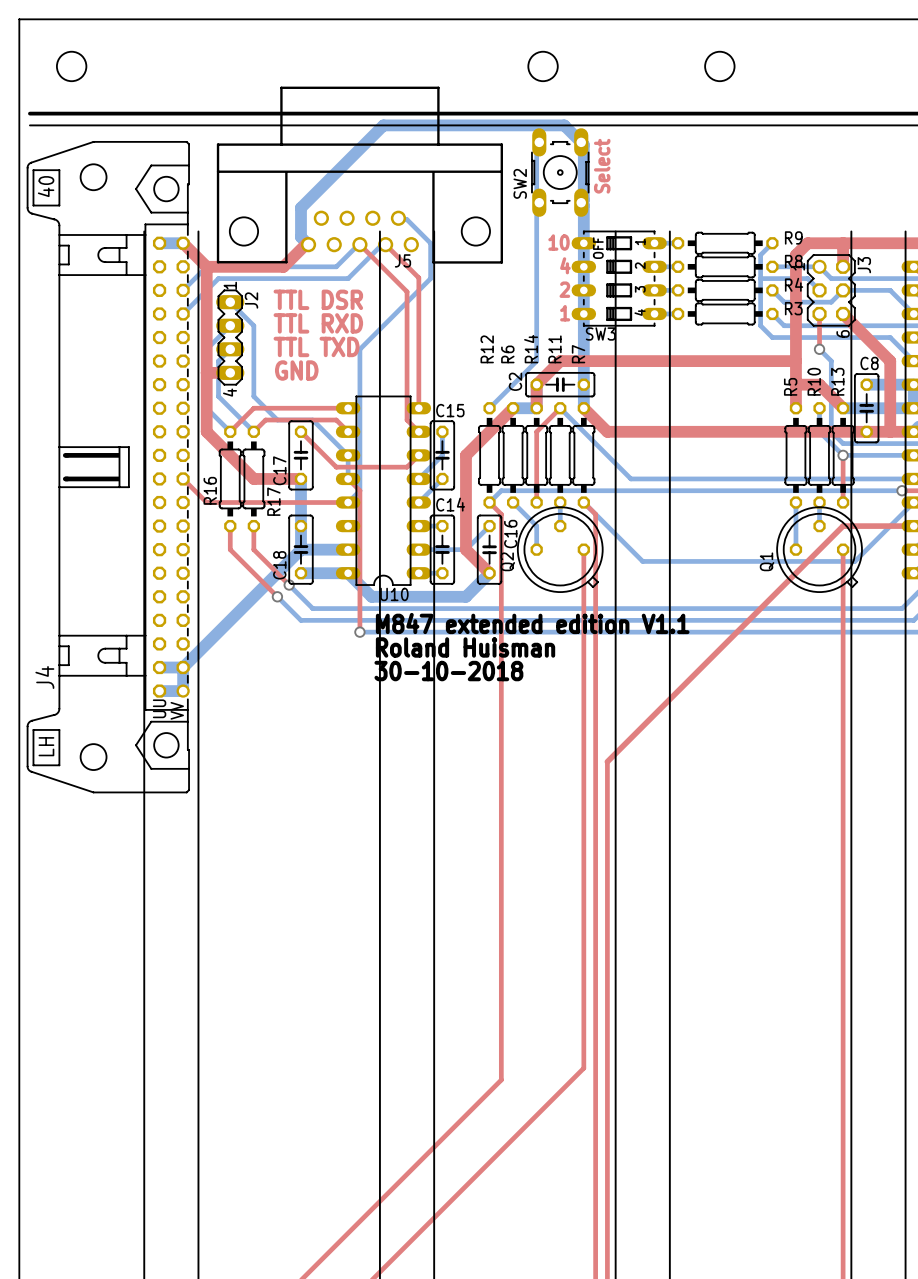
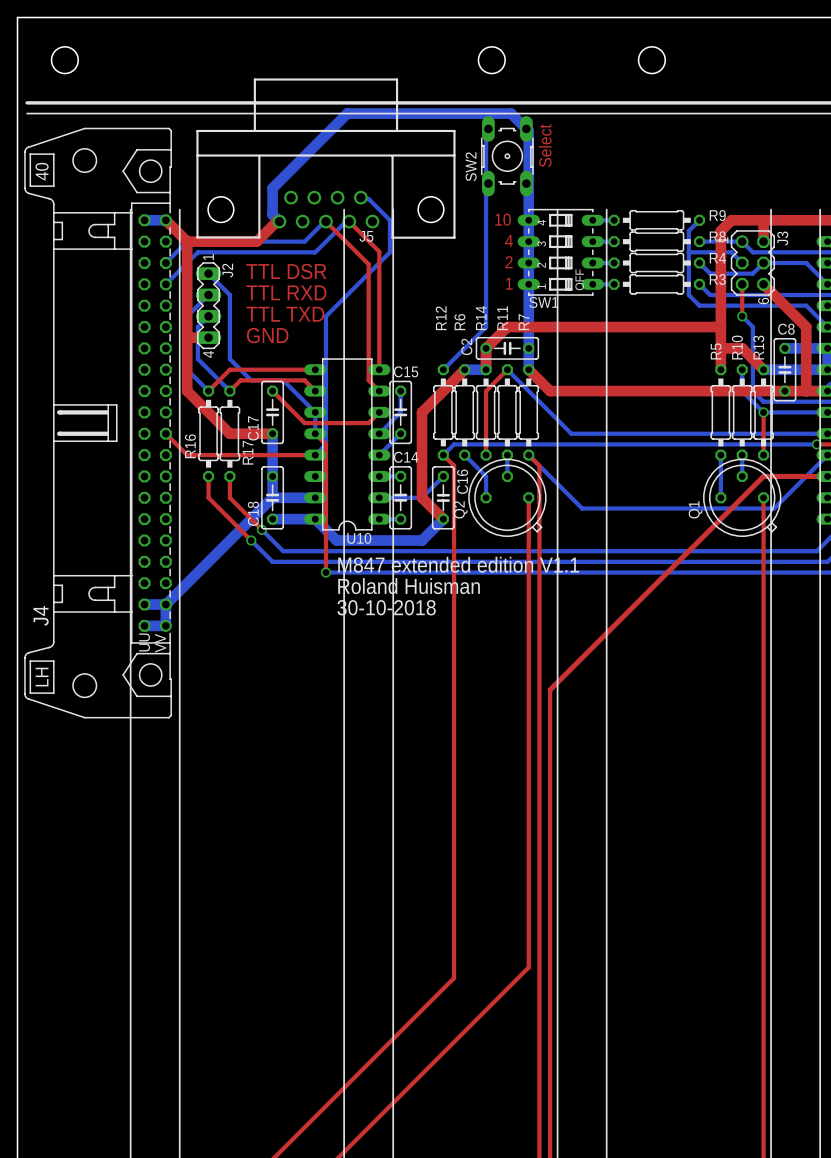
SW3: (619, 278) -> none
SW1: none -> (560, 252)

